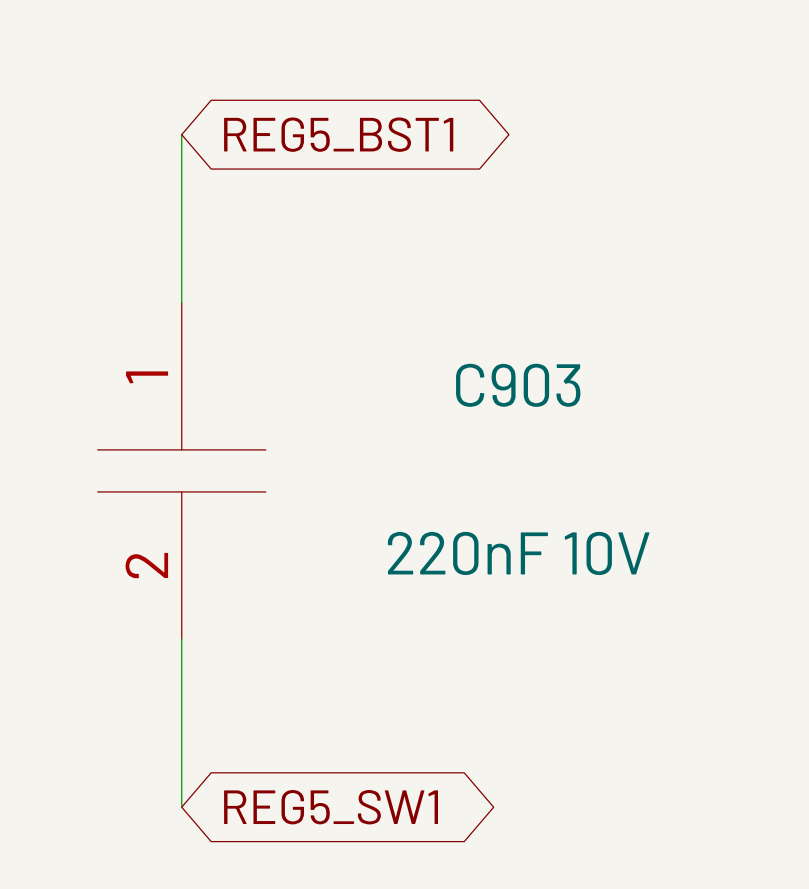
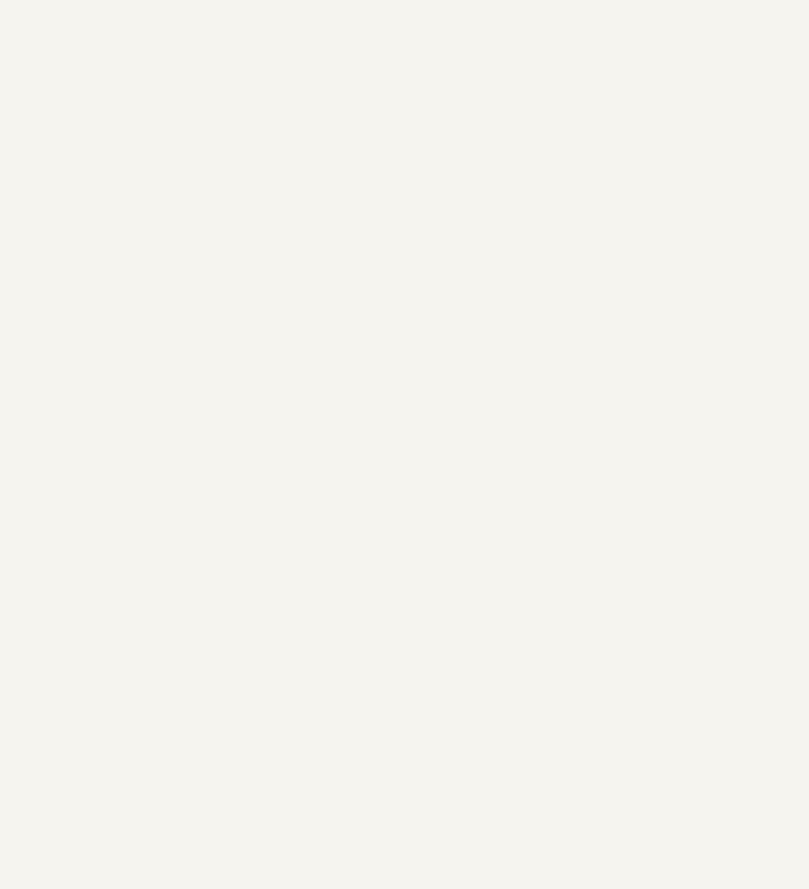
wire: (181, 134) (181, 302) -> none
global label: REG5_BST1 (338, 134) -> none
C903: 220nF 10V (181, 470) -> none
wire: (181, 639) (181, 807) -> none
global label: REG5_SW1 (331, 807) -> none

